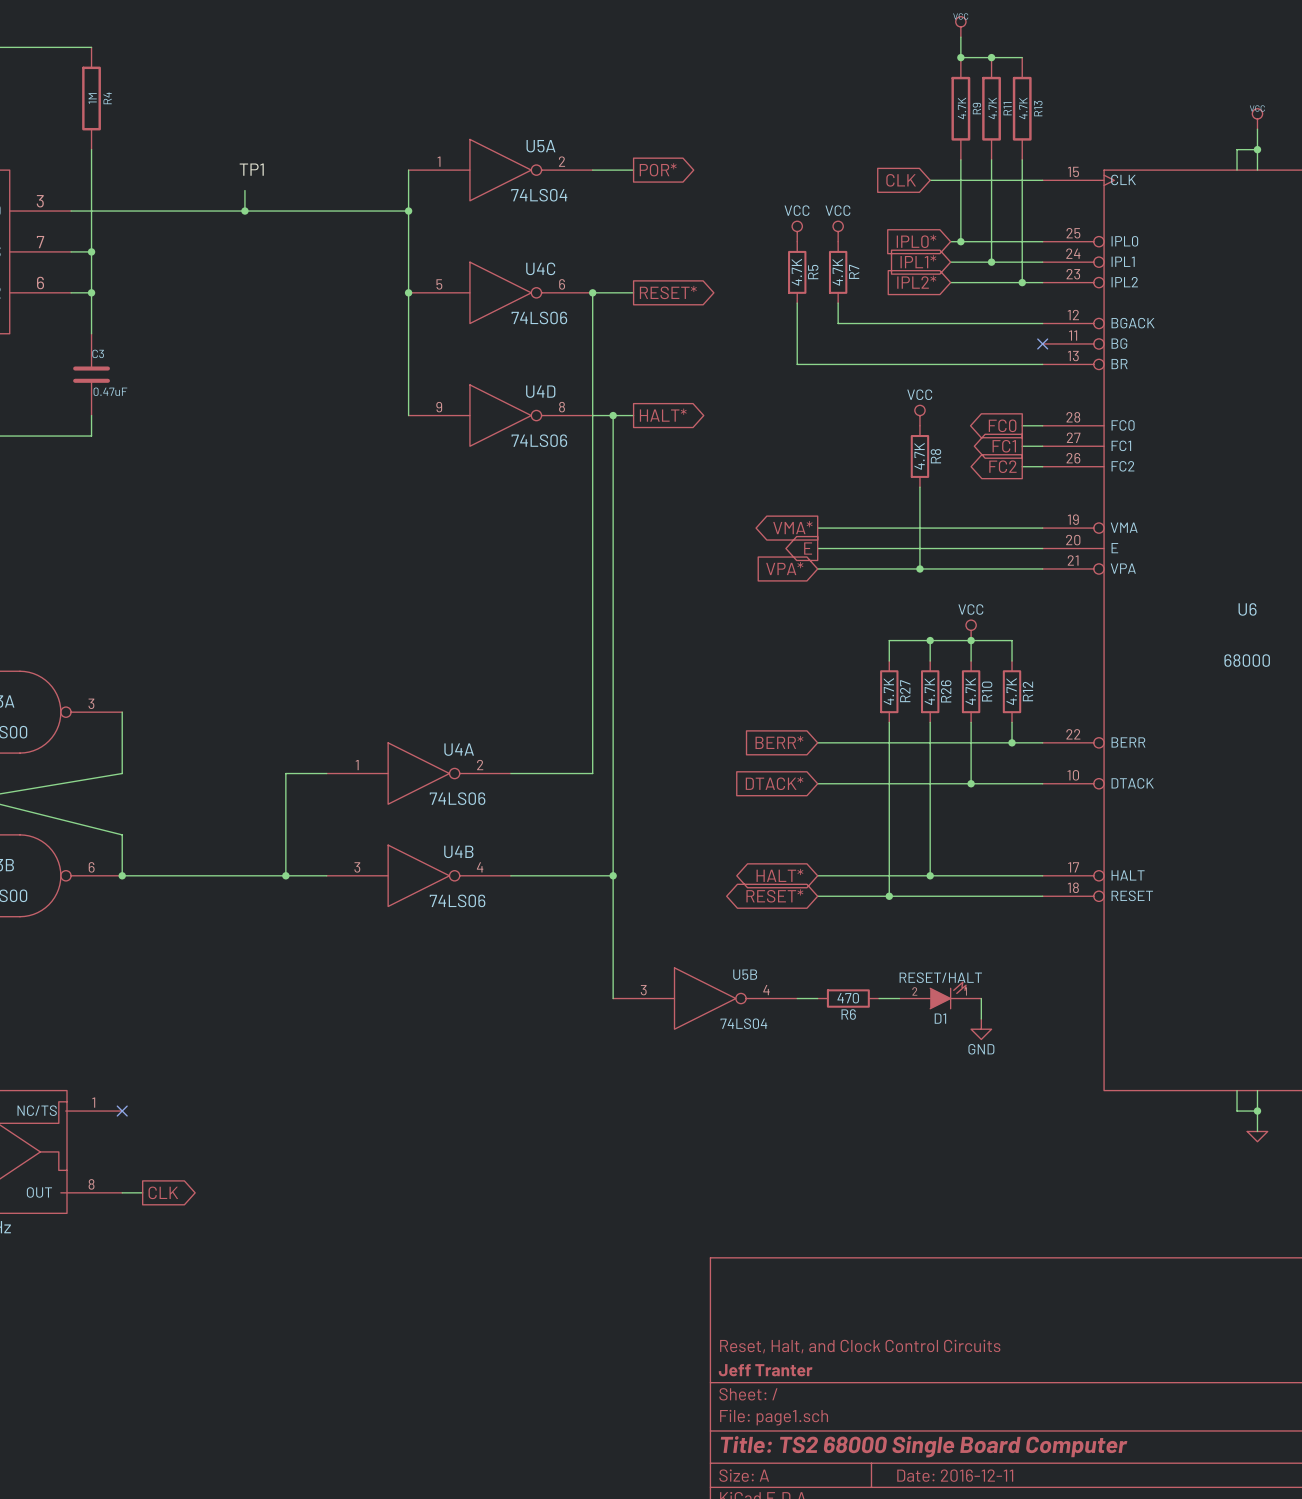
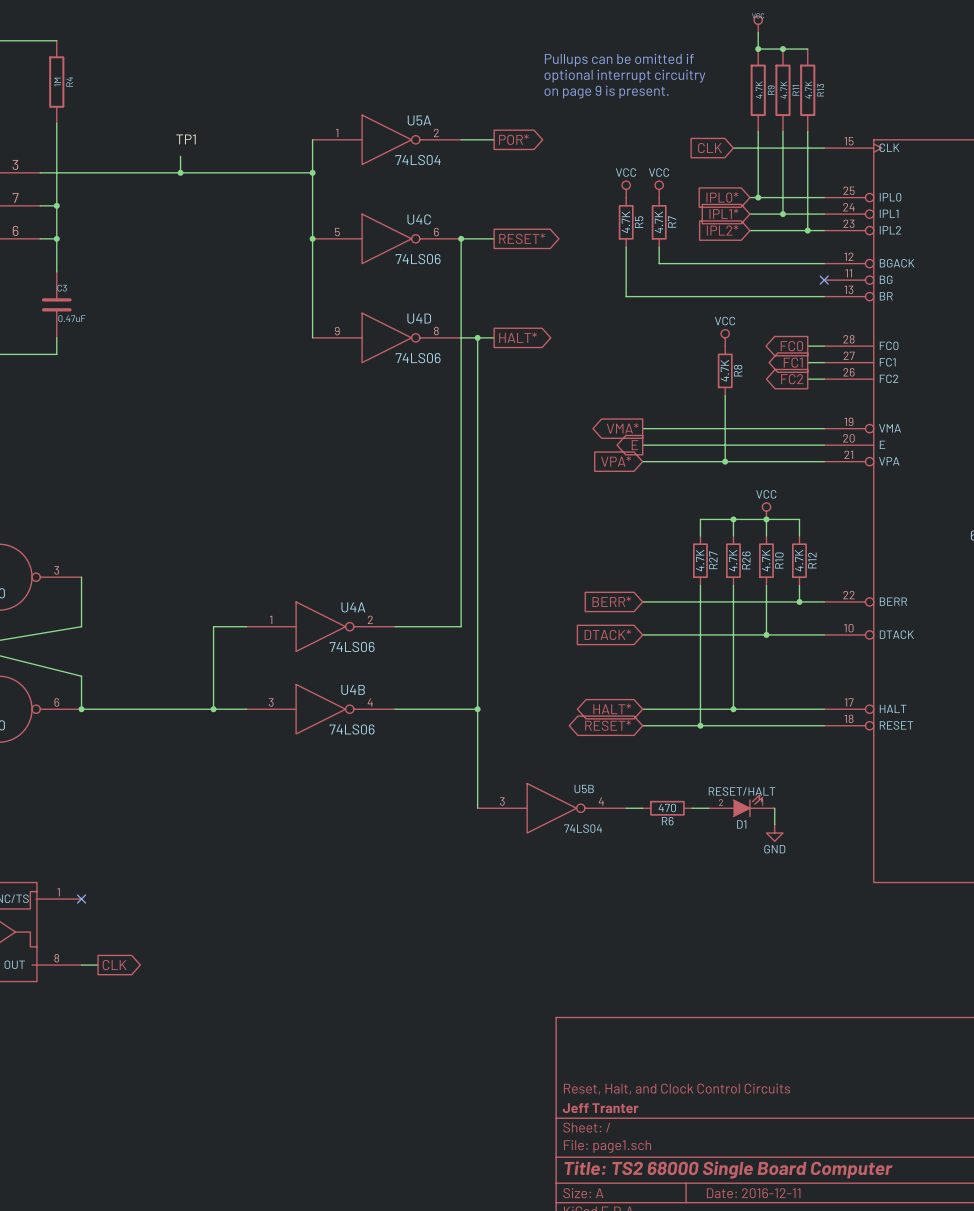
text: none -> Pullups can be omitted if (619, 60)
text: none -> optional interrupt circuitry (624, 76)
text: none -> on page 9 is present. (606, 92)

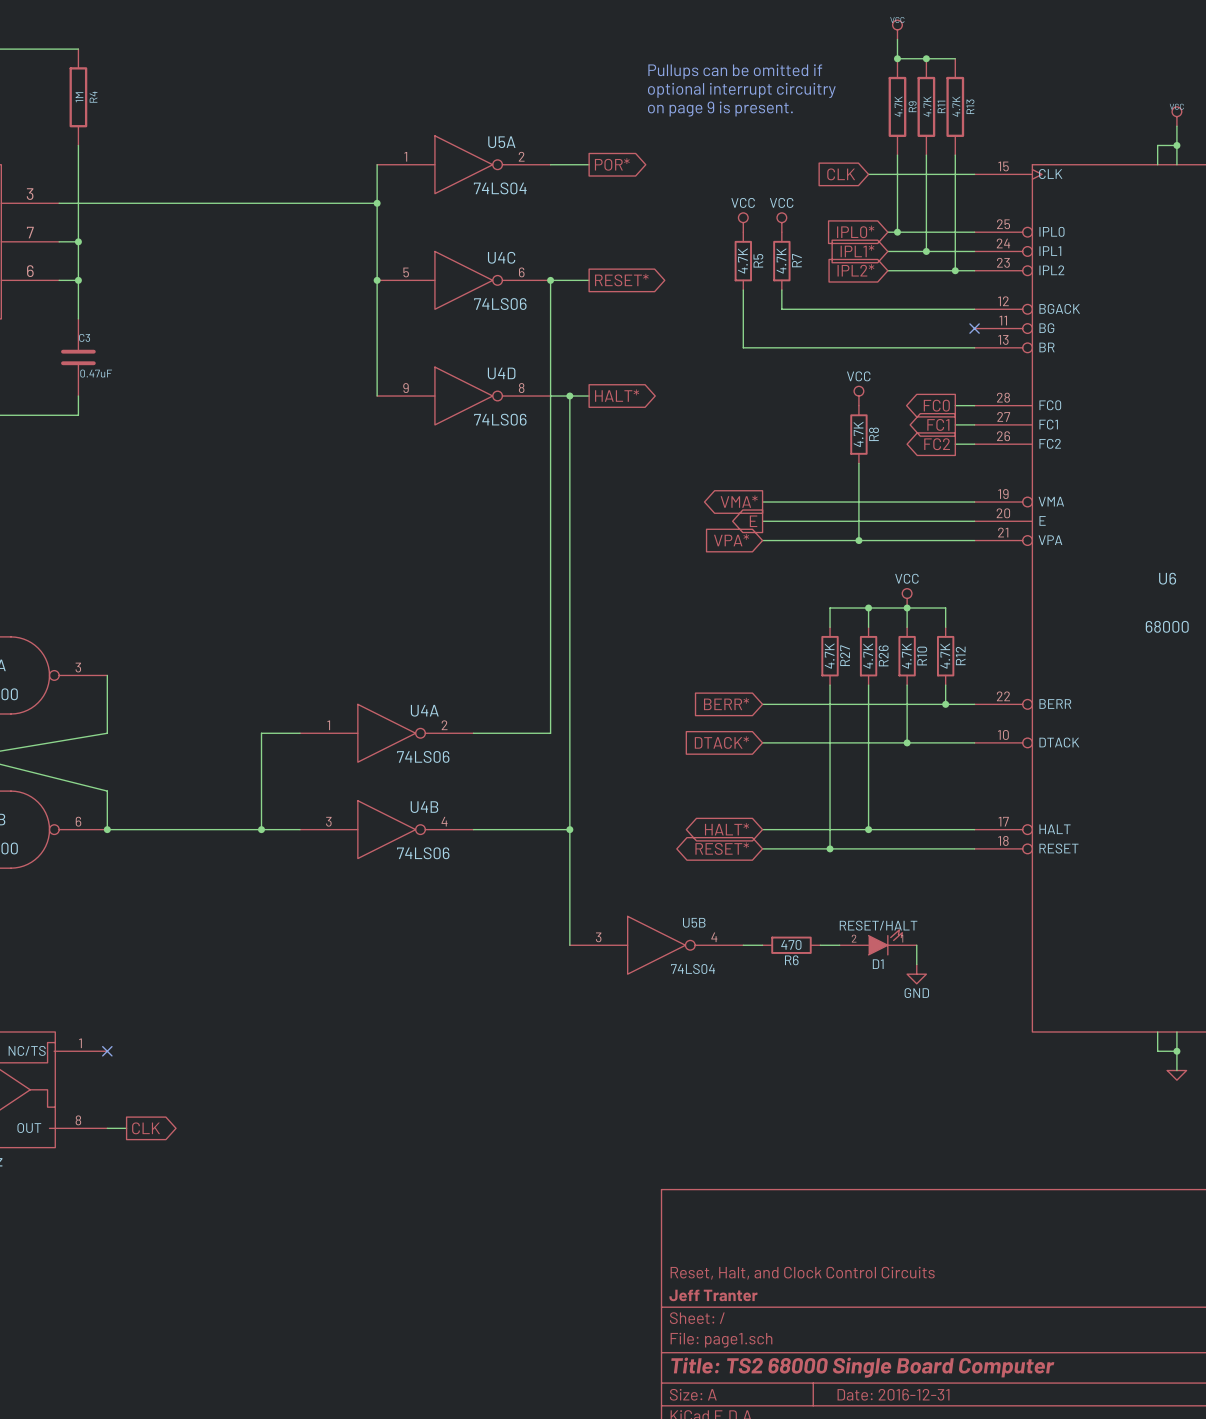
label: TP1 (186, 139) -> none
wire: (180, 156) (180, 172) -> none
junction: (180, 172) -> none
title block: Date: 2016-12-11 (753, 1193) -> Date: 2016-12-31 (893, 1394)

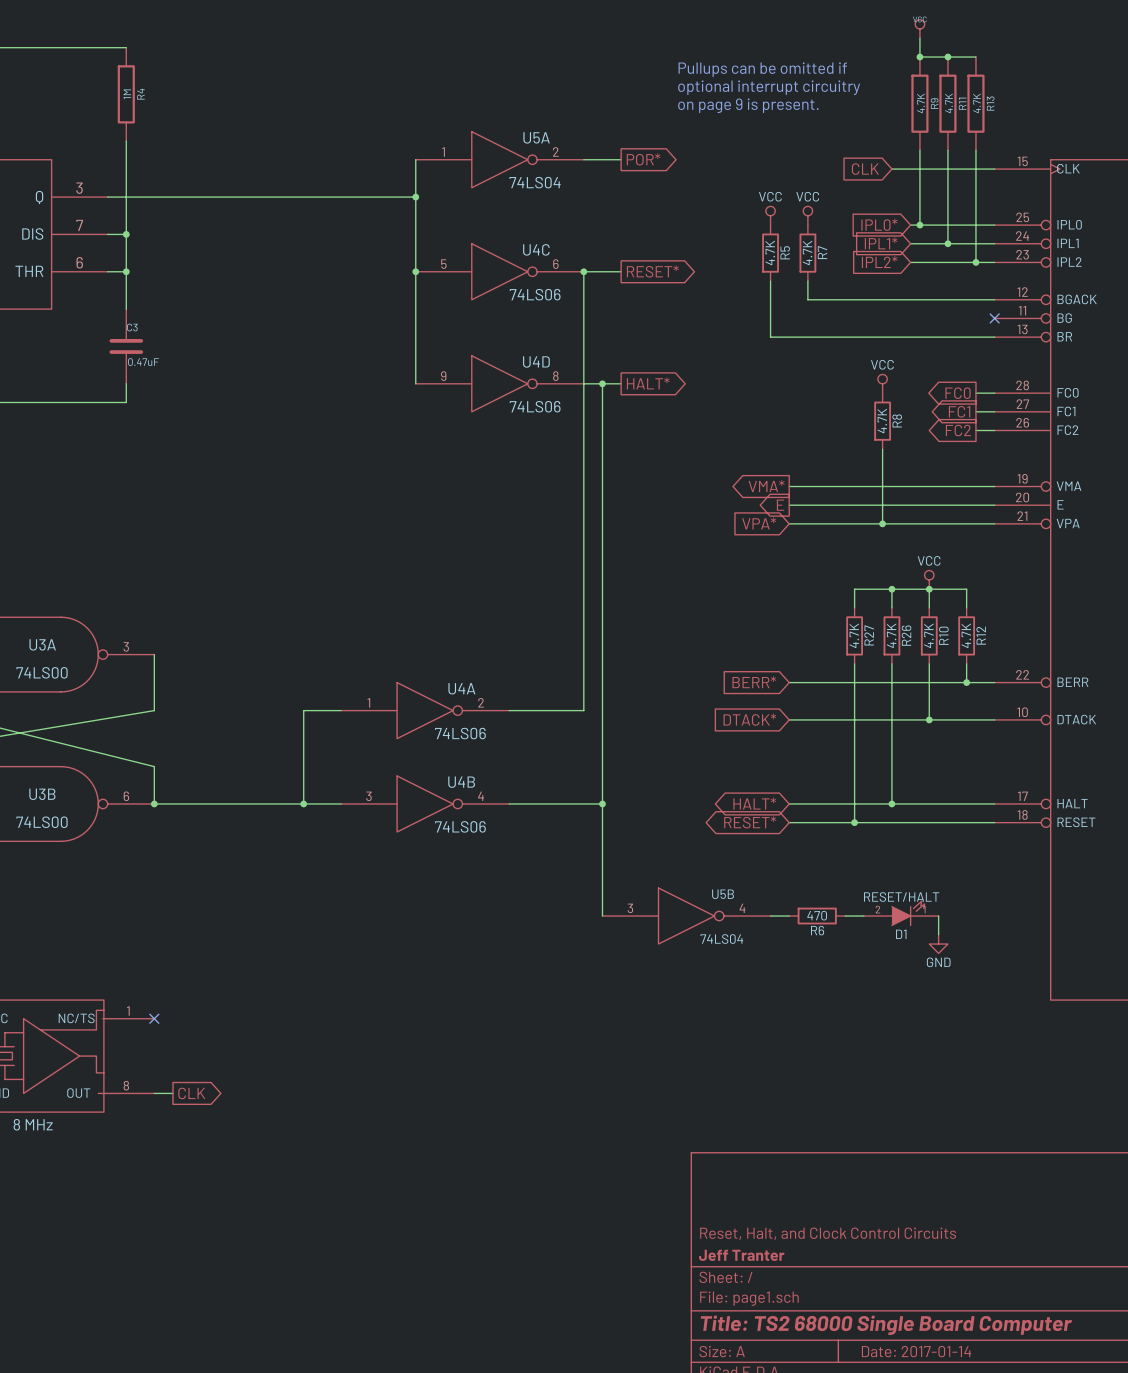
title block: Date: 2016-12-31 (893, 1394) -> Date: 2017-01-14 (916, 1351)

